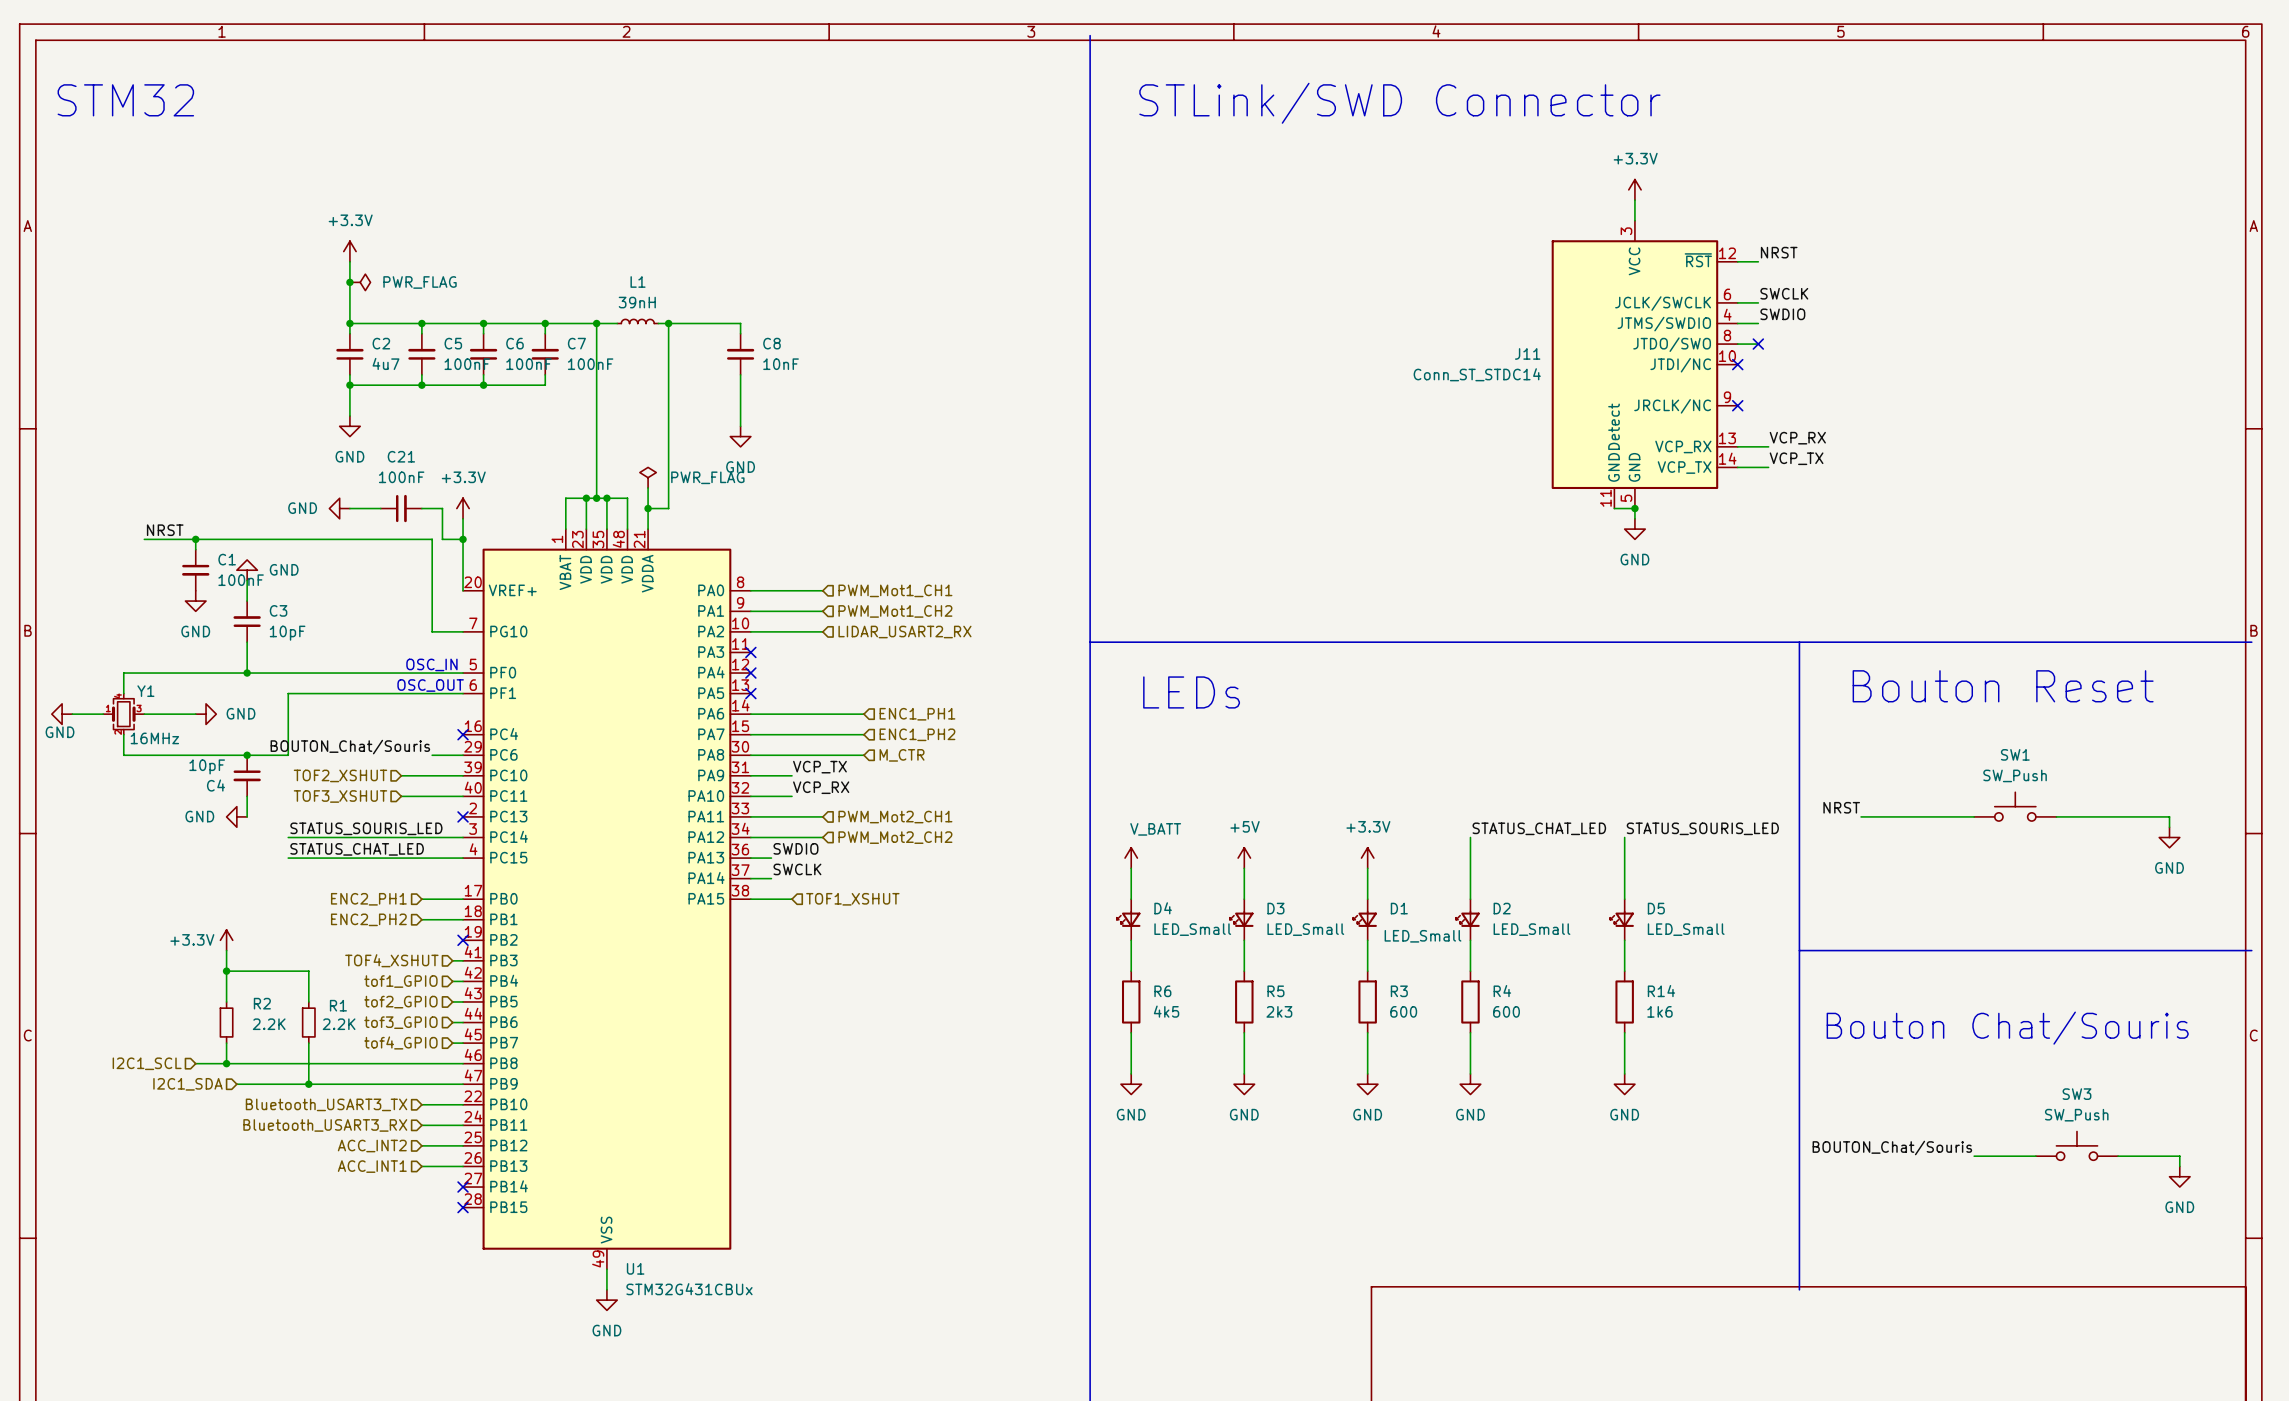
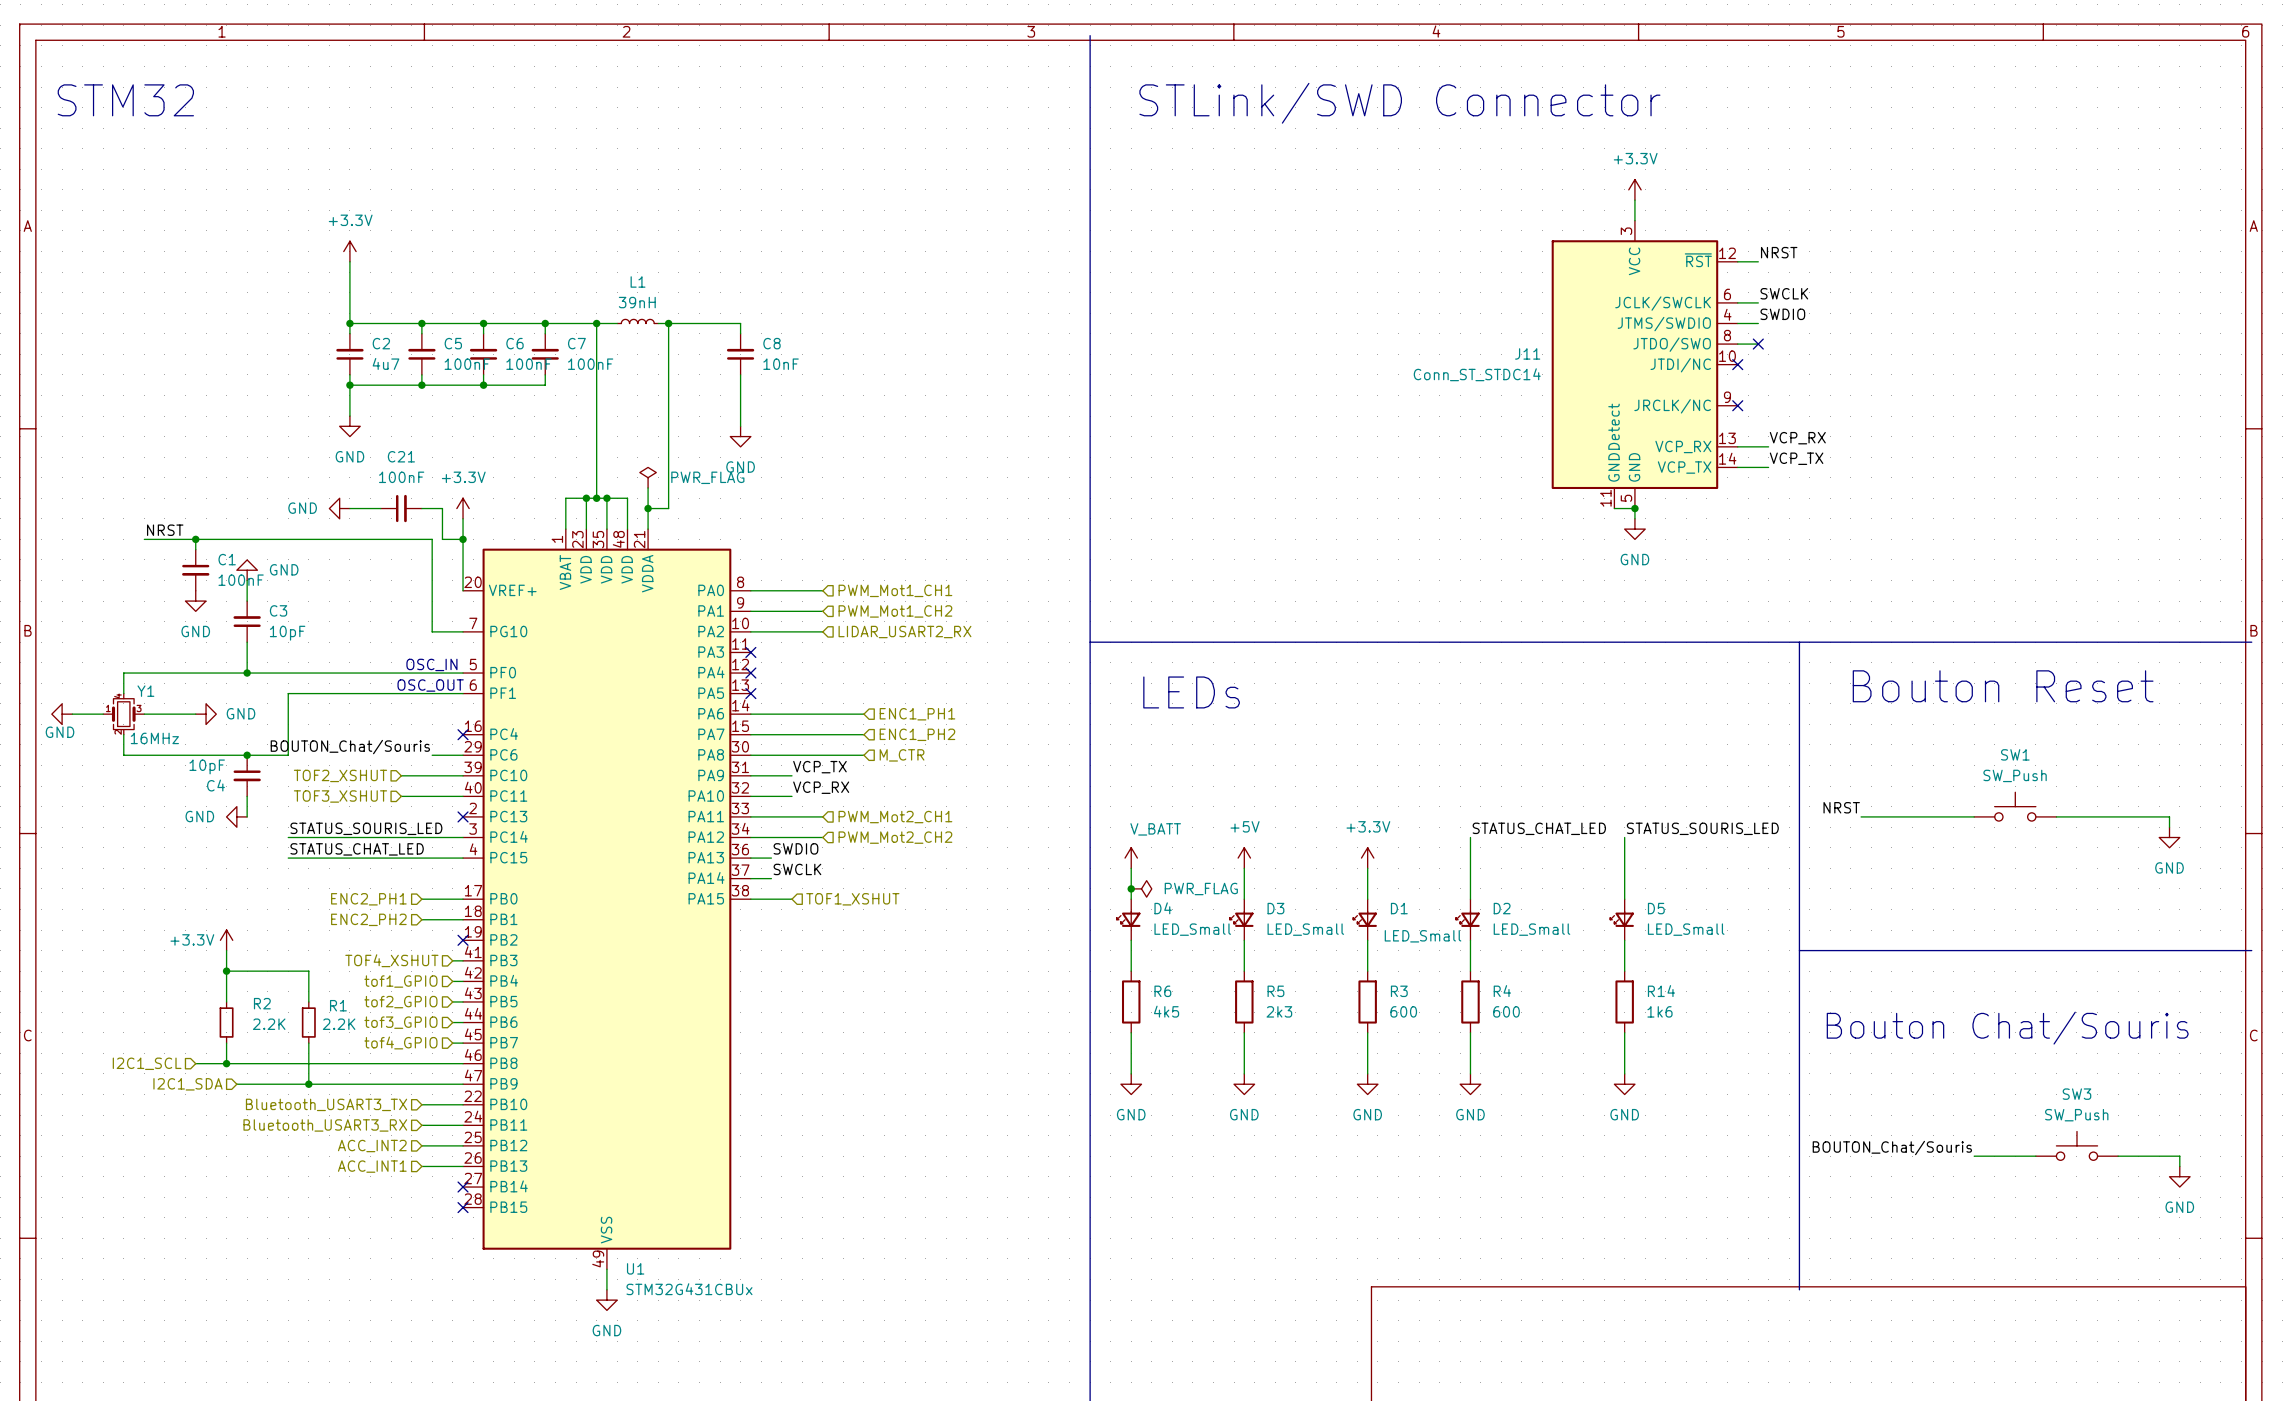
junction: (349, 282) -> none
power symbol: PWR_FLAG (360, 282) -> none
junction: none -> (1131, 888)
power symbol: none -> PWR_FLAG (1141, 888)

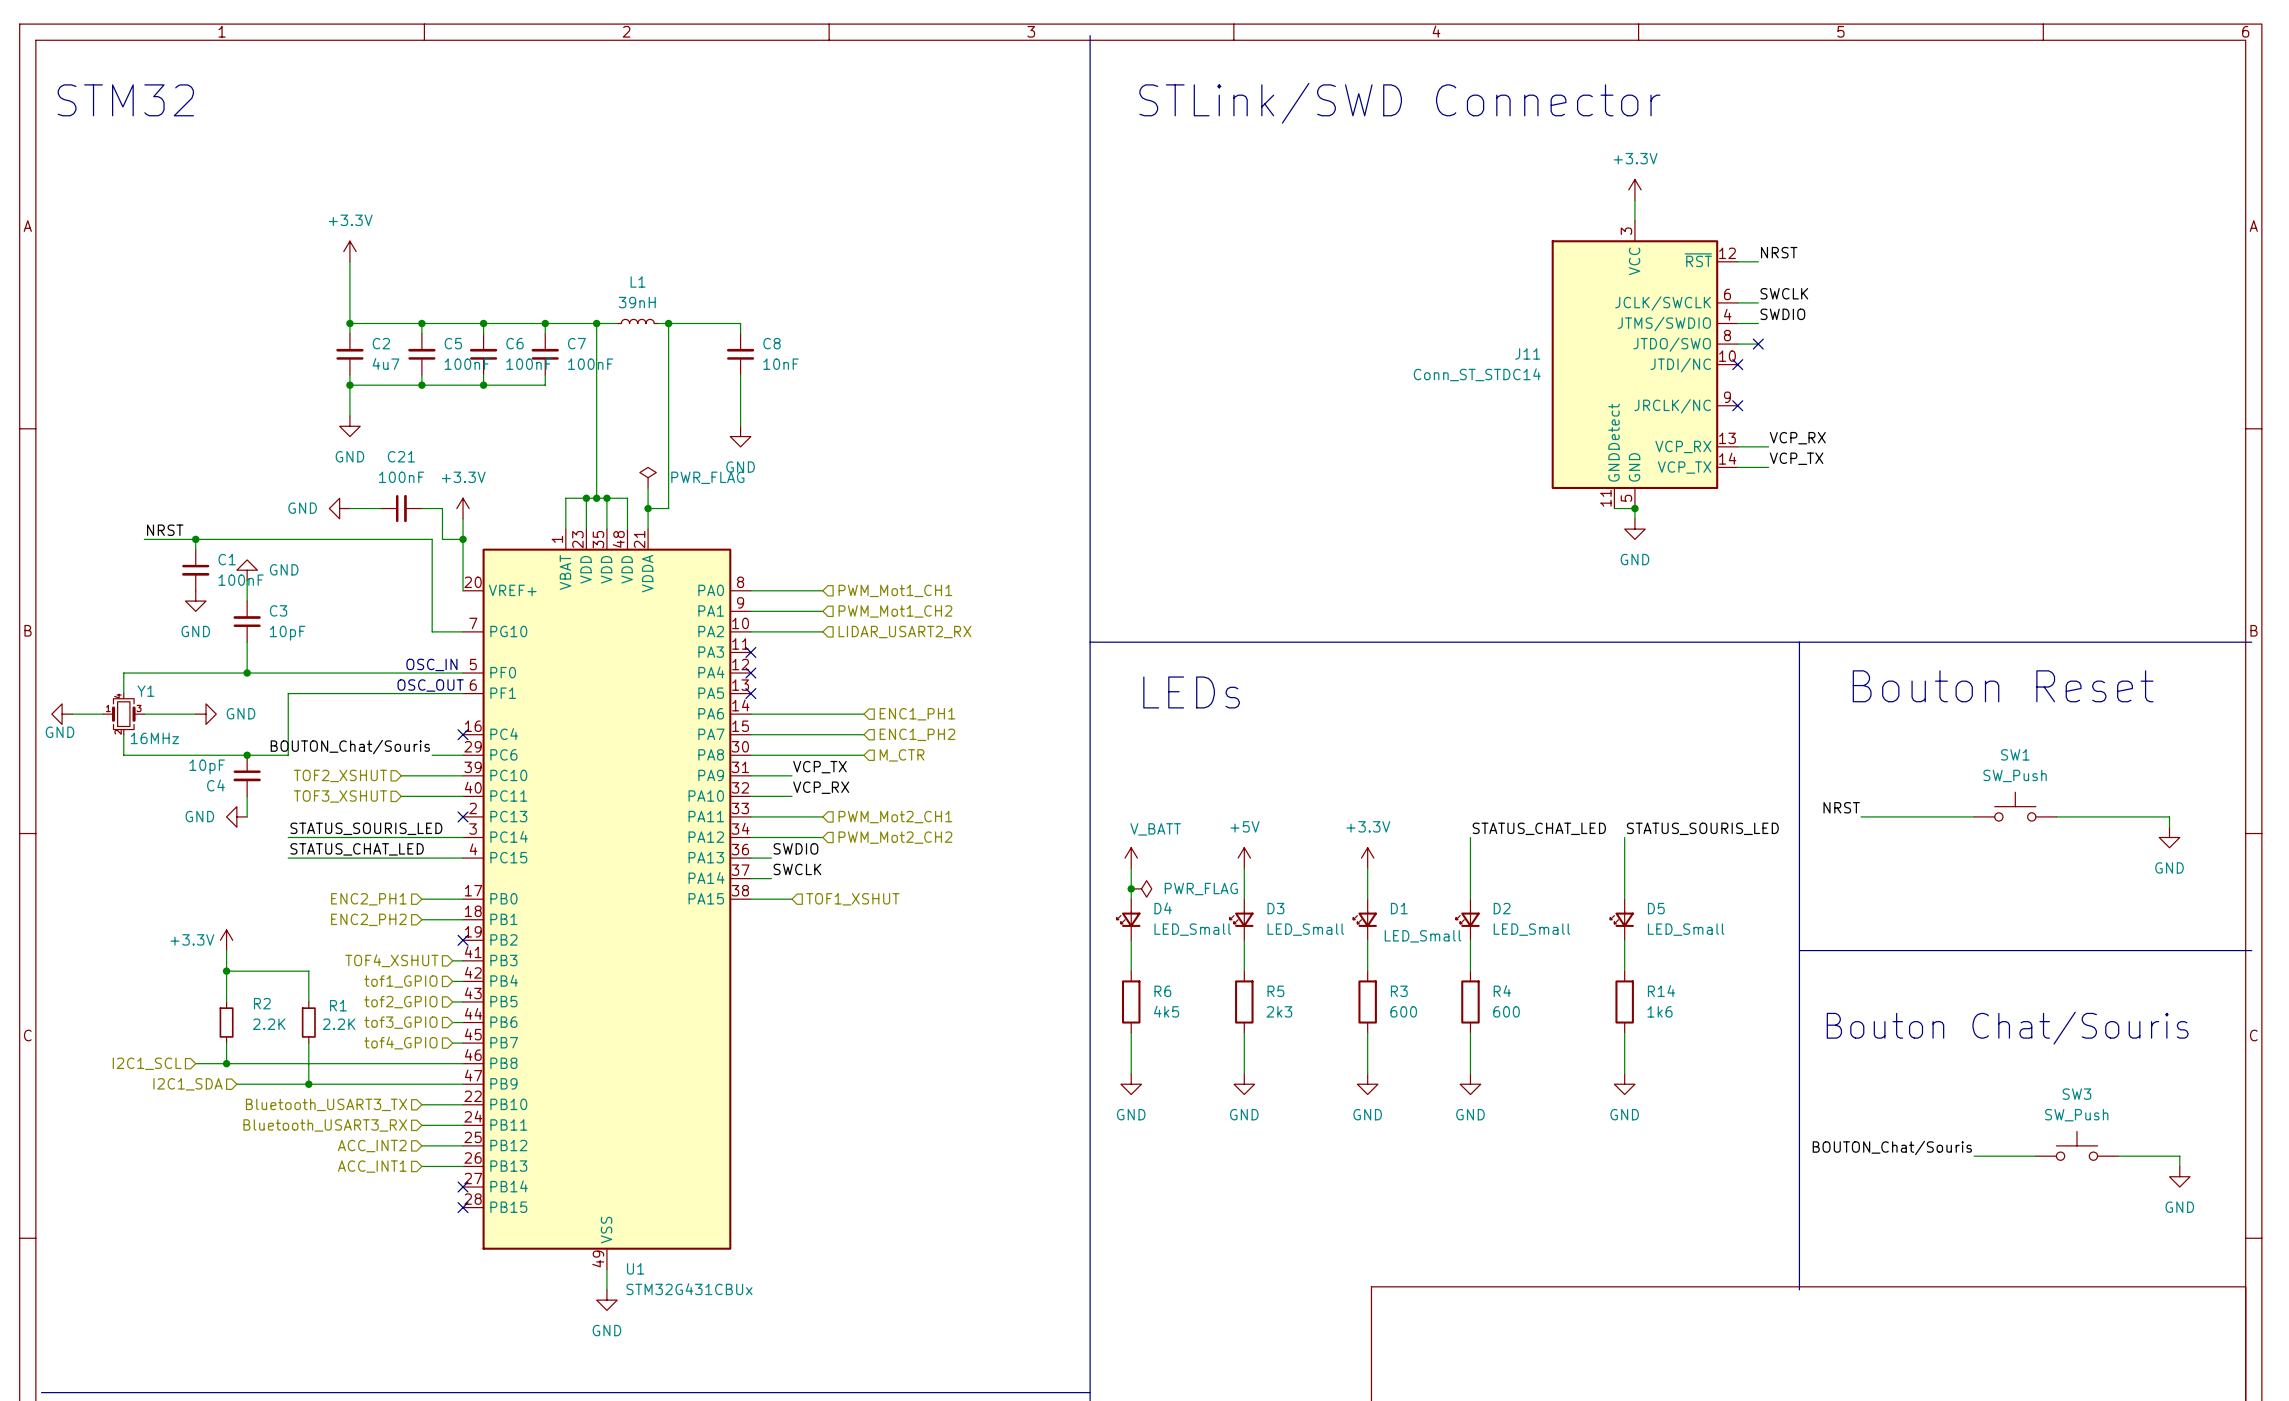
bus: none -> (41, 1392) (1090, 1392)

